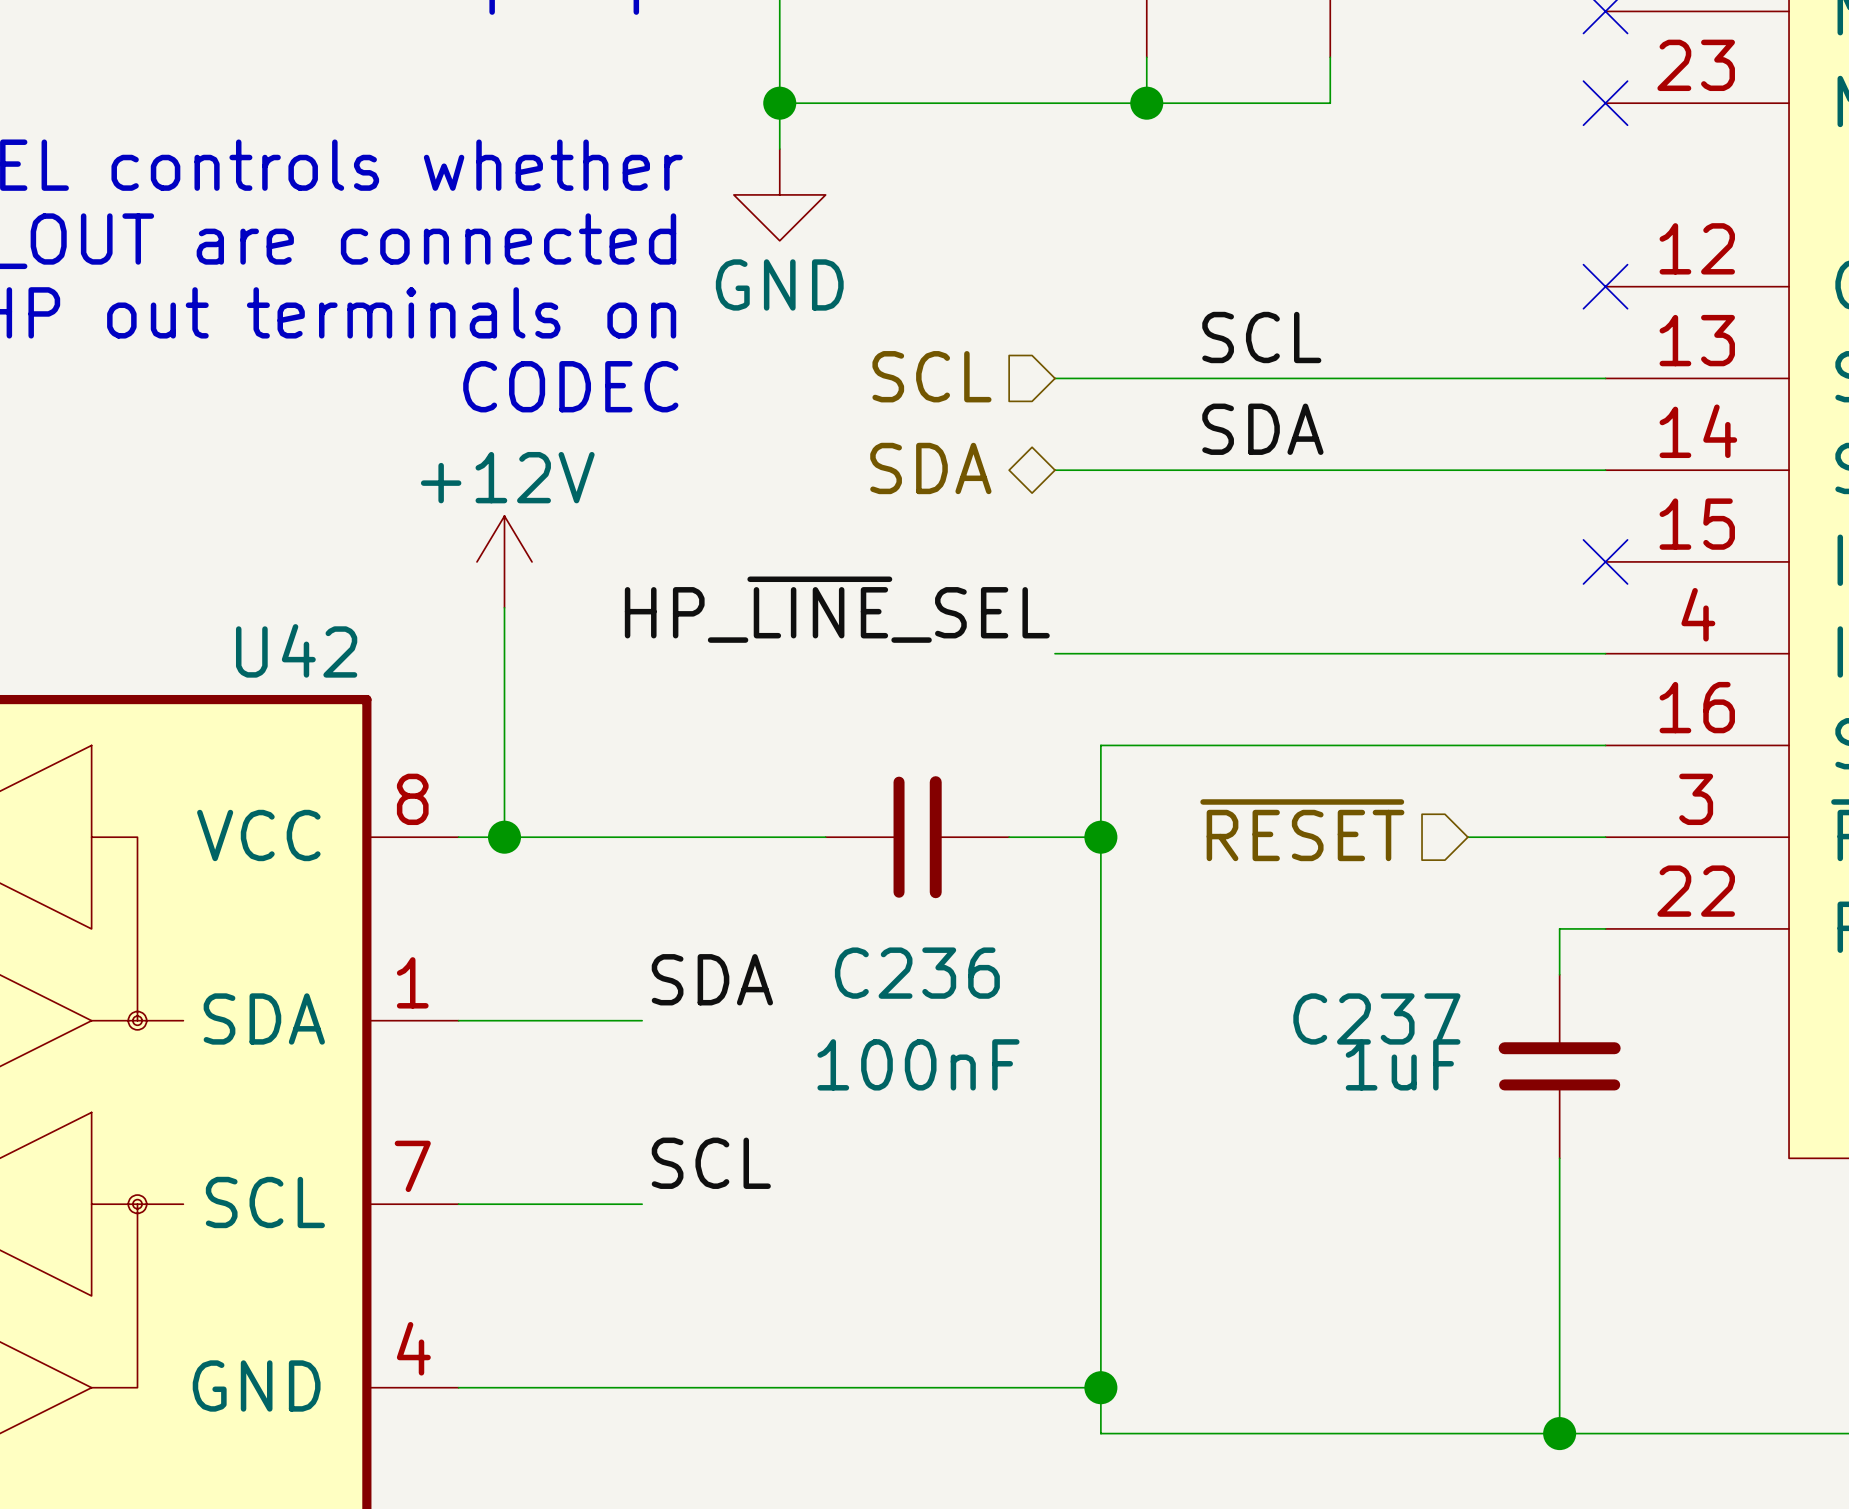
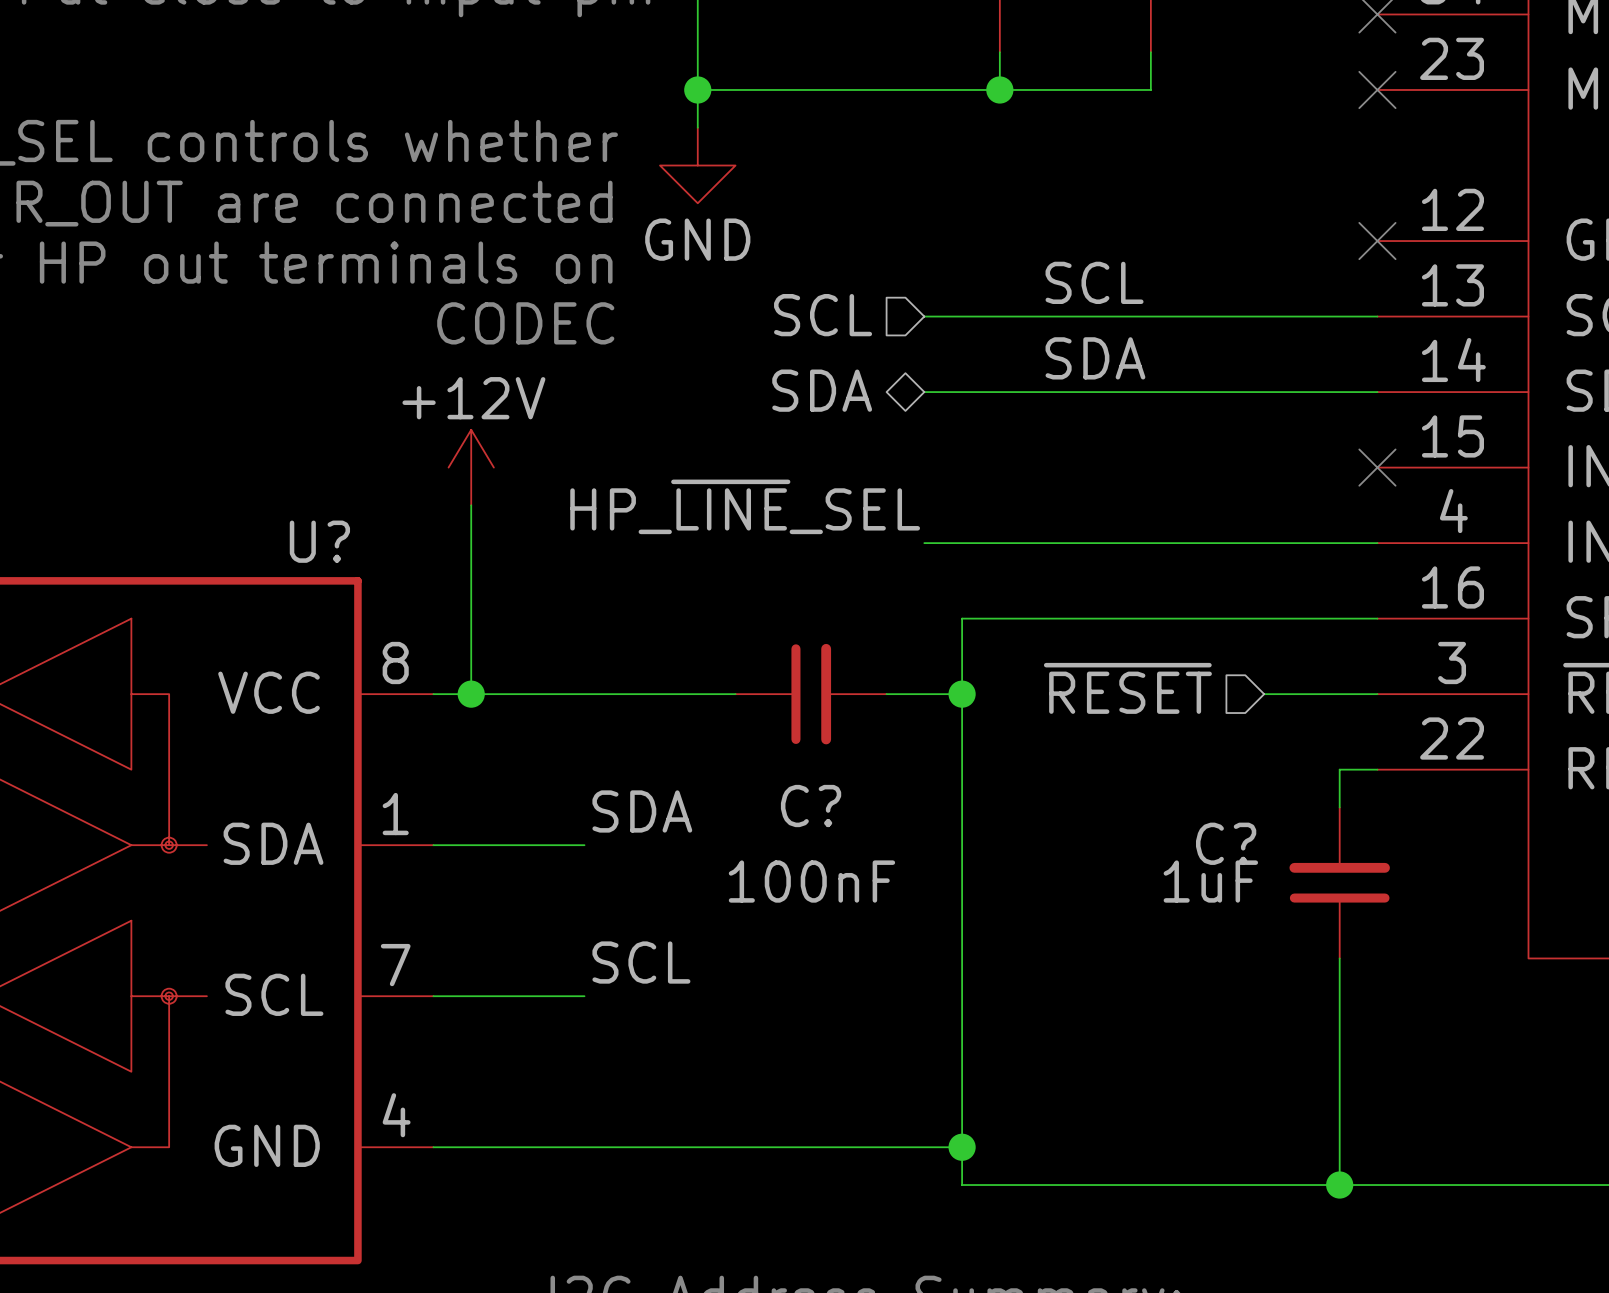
U42 name: U42 (296, 650) -> U? (319, 541)
C236 name: C236 (917, 973) -> C? (811, 806)
C237 name: C237 (1376, 1018) -> C? (1226, 843)

